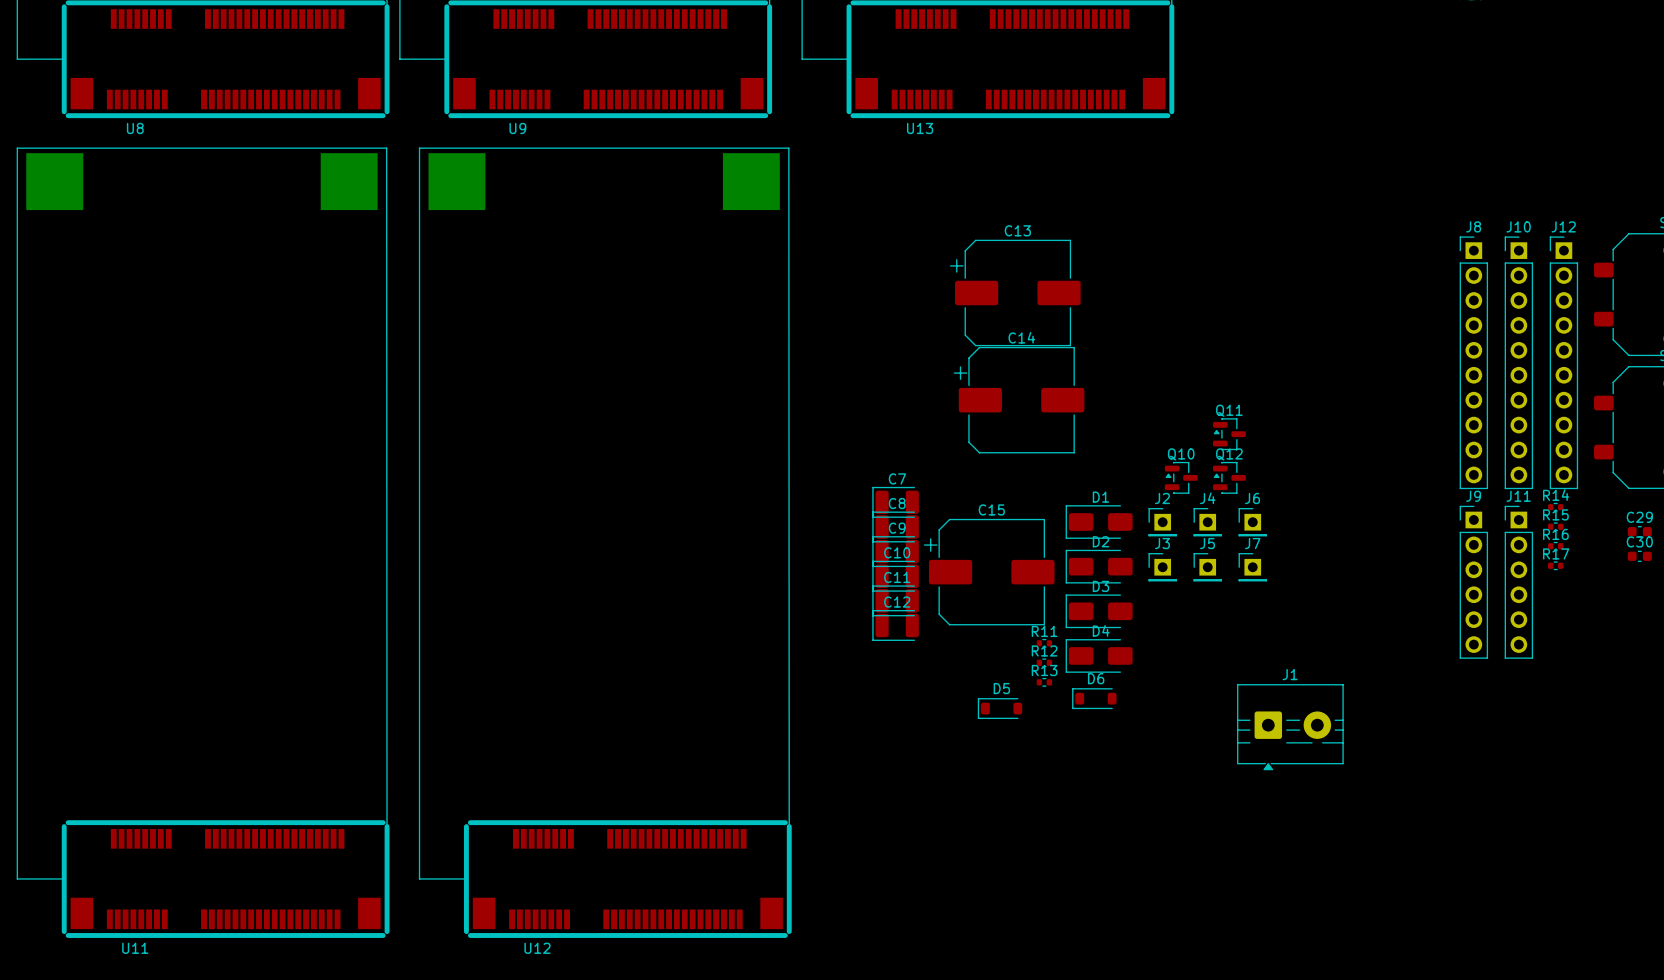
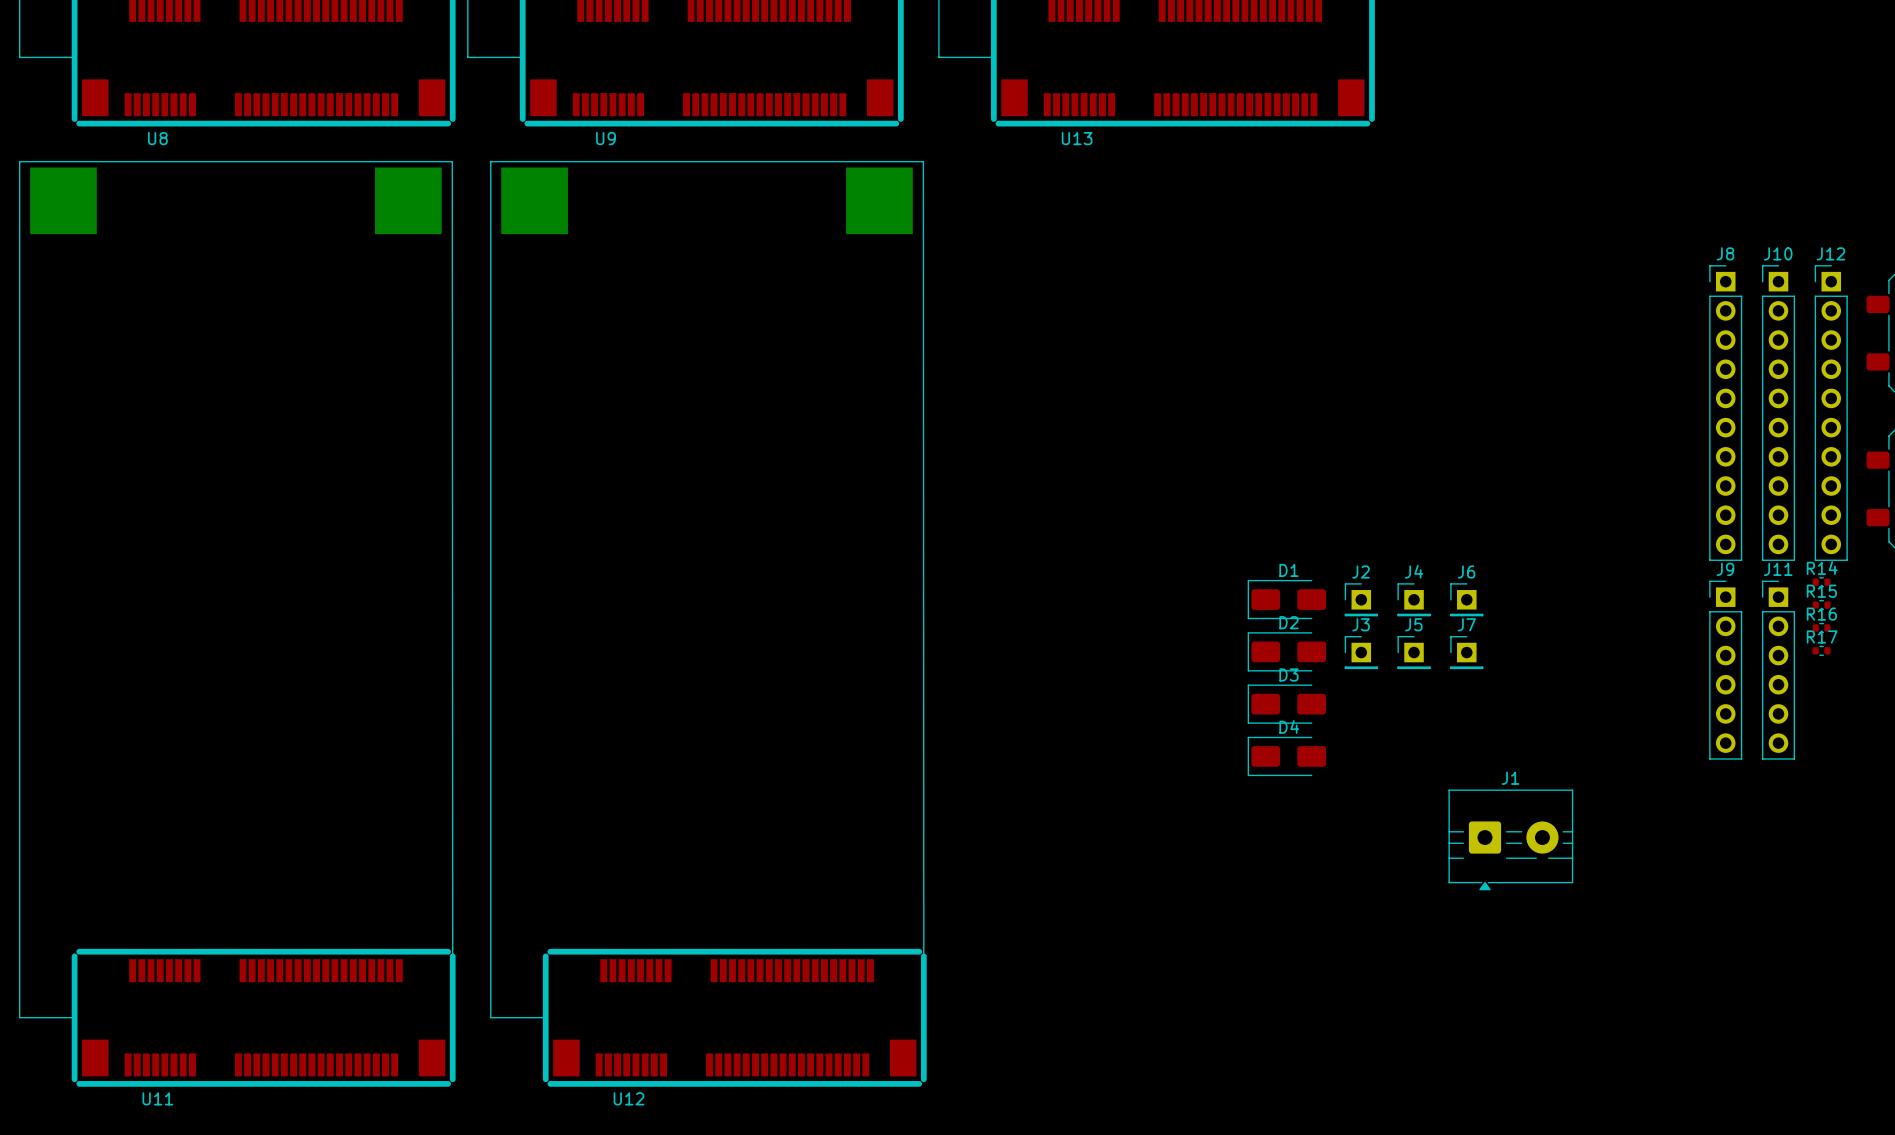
C13: (1015, 292) -> none
C14: (1019, 400) -> none
Q11: (1229, 434) -> none
Q10: (1181, 477) -> none
Q12: (1229, 477) -> none
C7: (895, 502) -> none
C8: (895, 526) -> none
C9: (895, 551) -> none
C15: (989, 572) -> none
C10: (895, 576) -> none
C11: (895, 600) -> none
C12: (895, 625) -> none
R11: (1044, 643) -> none
R12: (1044, 662) -> none
R13: (1044, 682) -> none
D6: (1094, 698) -> none
D5: (1000, 708) -> none

